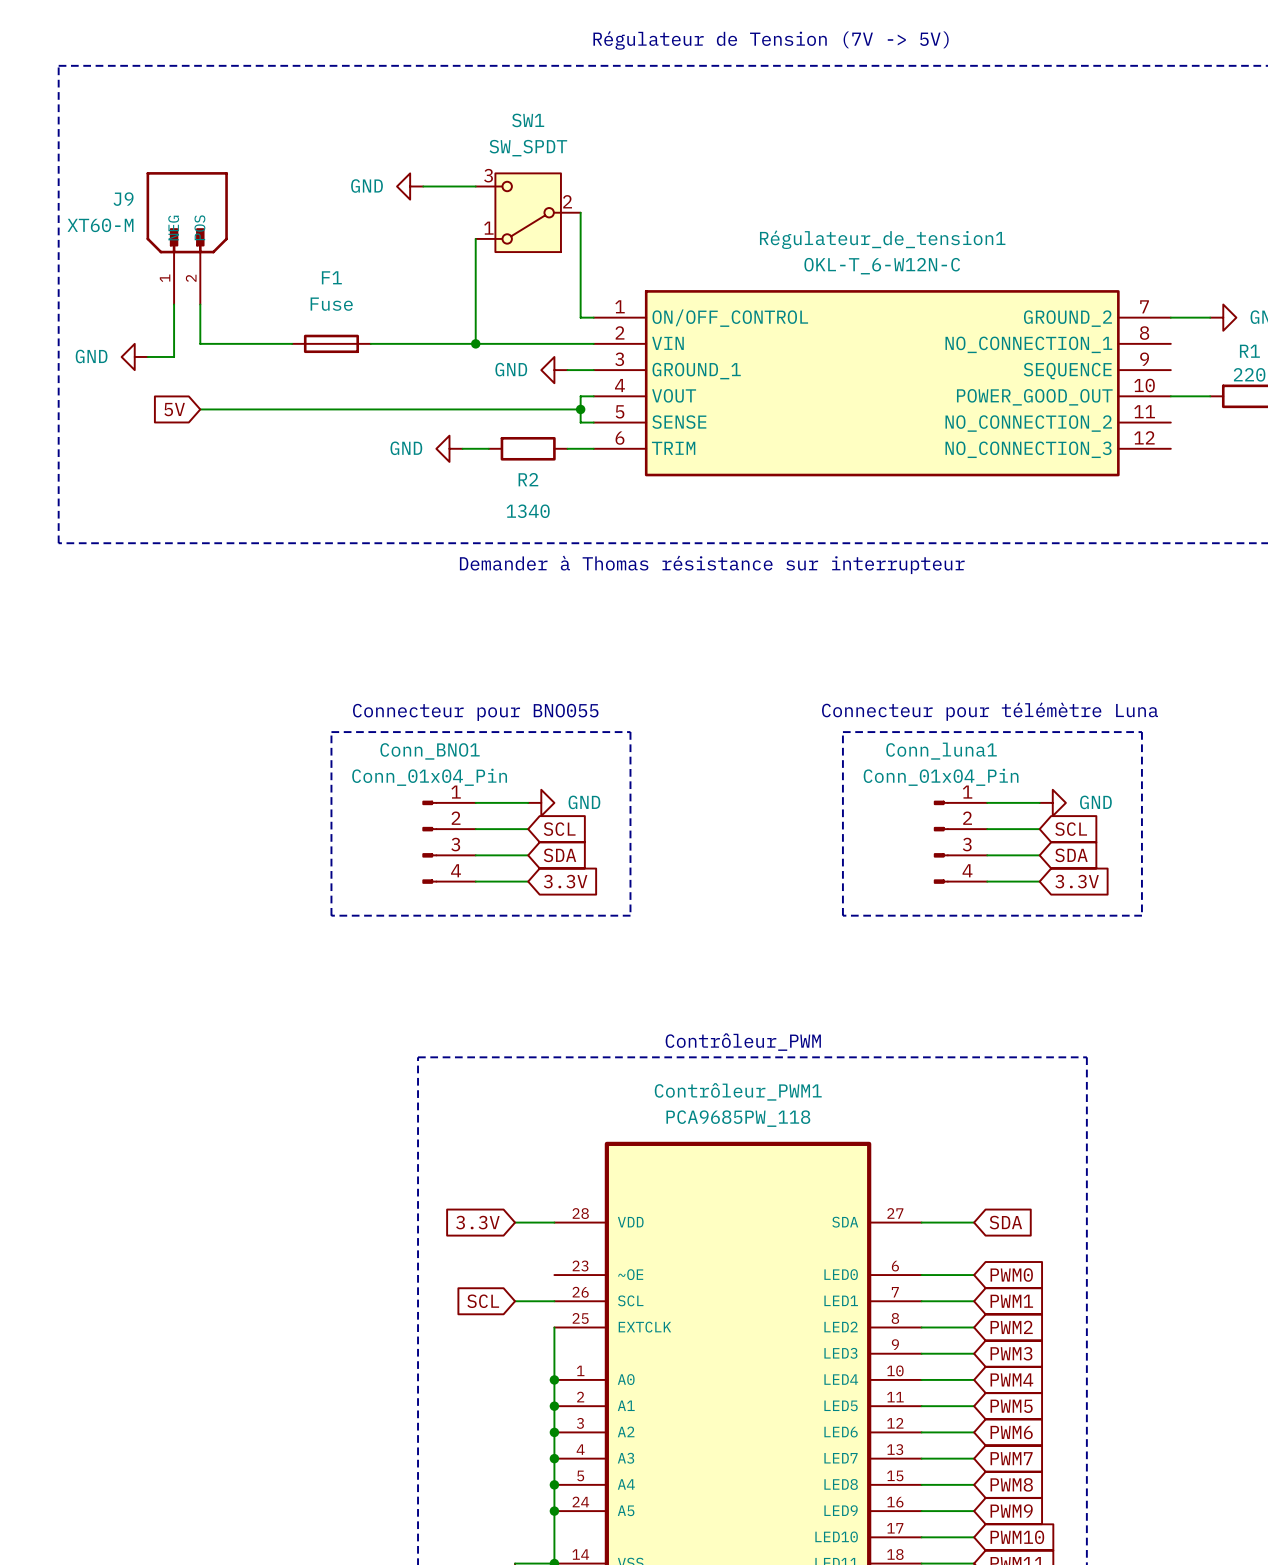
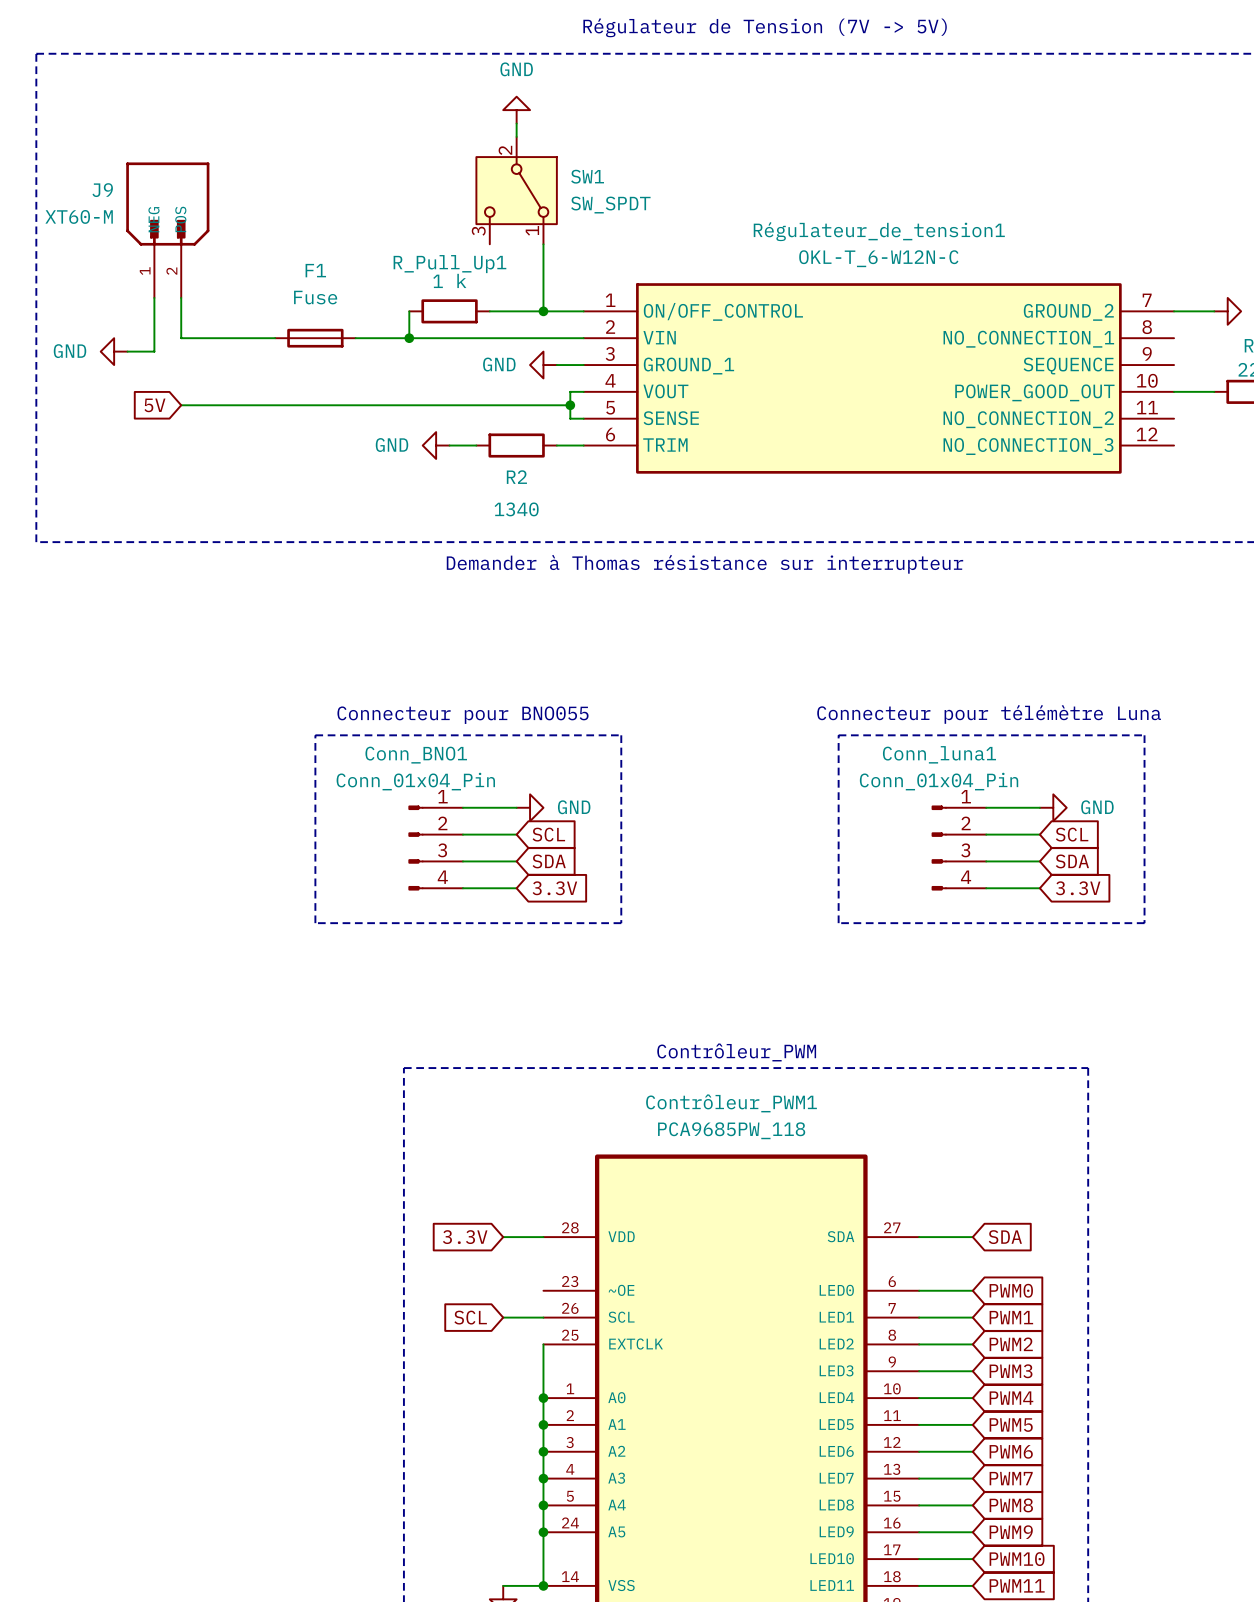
SW1 name position: SW1 (528, 120) -> SW1 (587, 176)
wire: none -> (516, 123) (516, 136)
SW1 value position: SW_SPDT (528, 148) -> SW_SPDT (610, 205)
power symbol rotation: 0° (410, 186) -> 90° clockwise (516, 110)
power symbol position: GND (410, 186) -> GND (516, 110)
wire: (423, 186) (475, 186) -> none
SW1 rotation: 0° (528, 212) -> 90° counterclockwise (516, 190)
wire: (580, 212) (580, 317) -> (489, 311) (570, 311)
wire: (475, 238) (475, 343) -> none
wire: none -> (543, 244) (543, 311)
wire: none -> (409, 311) (409, 338)
R_Pull_Up1: none -> 1 k (449, 311)
junction: none -> (543, 311)
junction: none -> (409, 338)
junction: (475, 343) -> none

